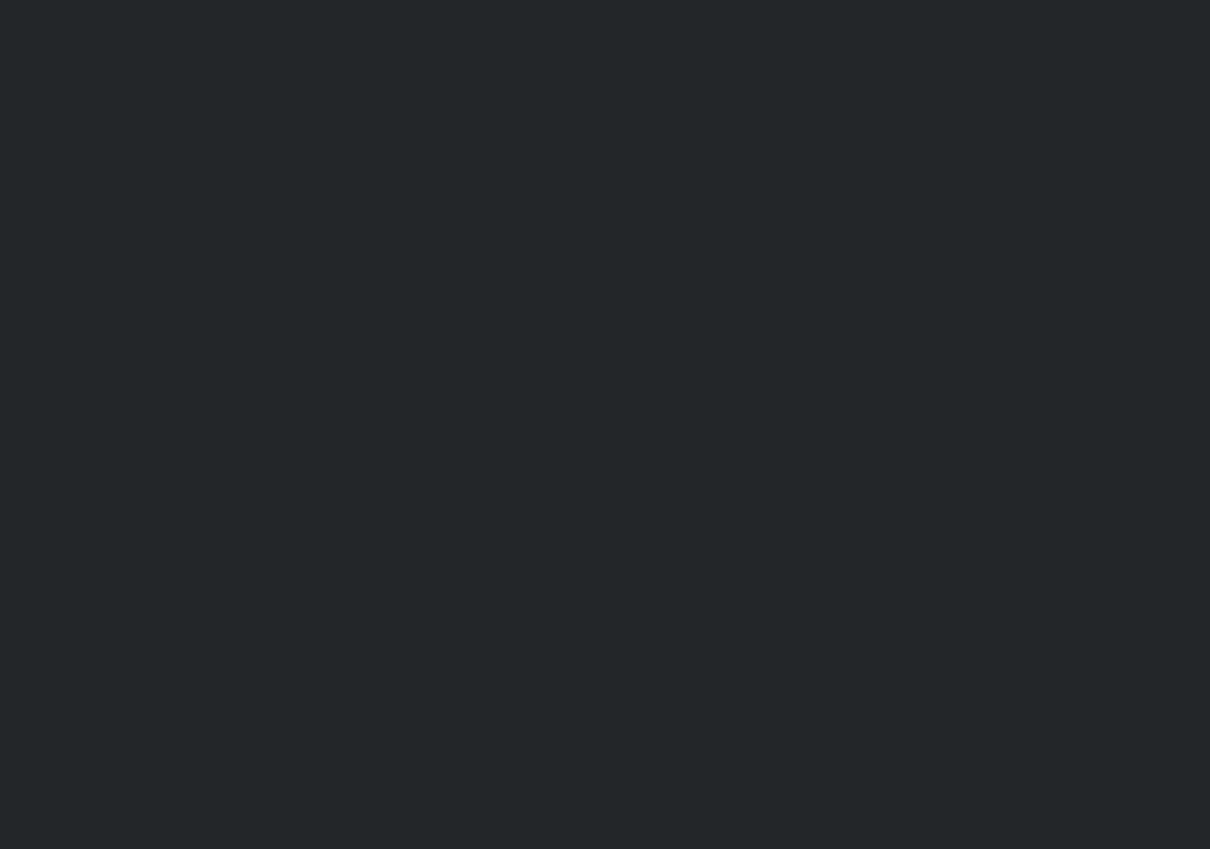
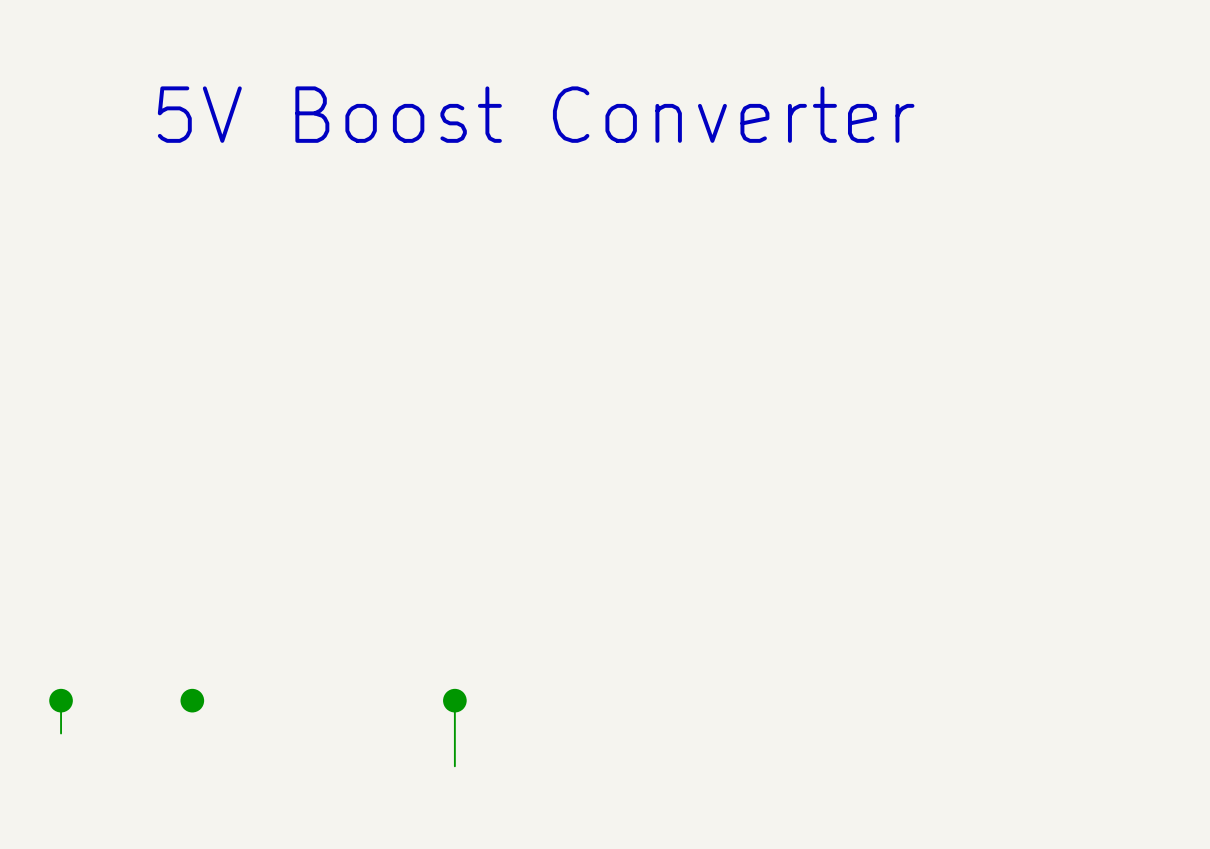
text: none -> 5V Boost Converter (536, 114)
wire: none -> (61, 700) (61, 733)
junction: none -> (61, 700)
junction: none -> (192, 700)
wire: none -> (454, 700) (454, 766)
junction: none -> (454, 700)

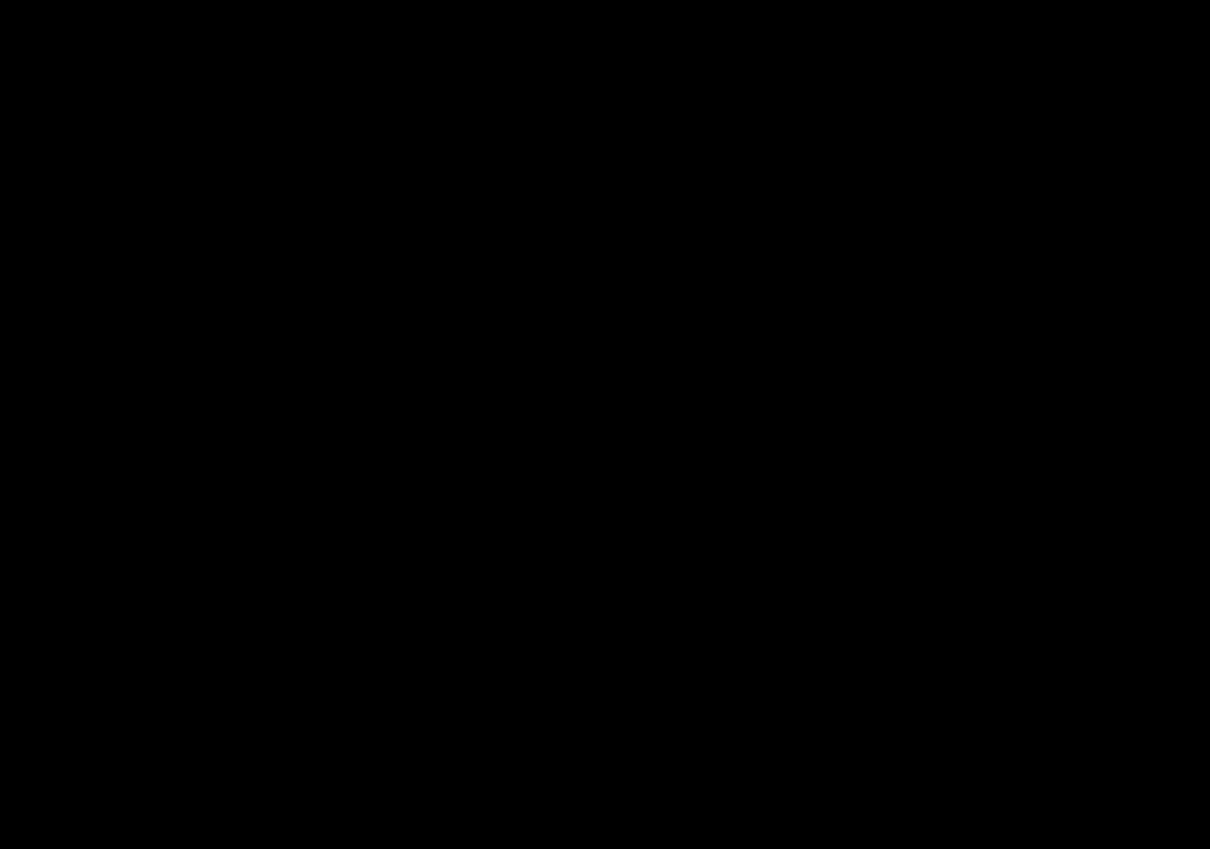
text: 5V Boost Converter (536, 114) -> none
wire: (61, 700) (61, 733) -> none
junction: (61, 700) -> none
junction: (192, 700) -> none
wire: (454, 700) (454, 766) -> none
junction: (454, 700) -> none

